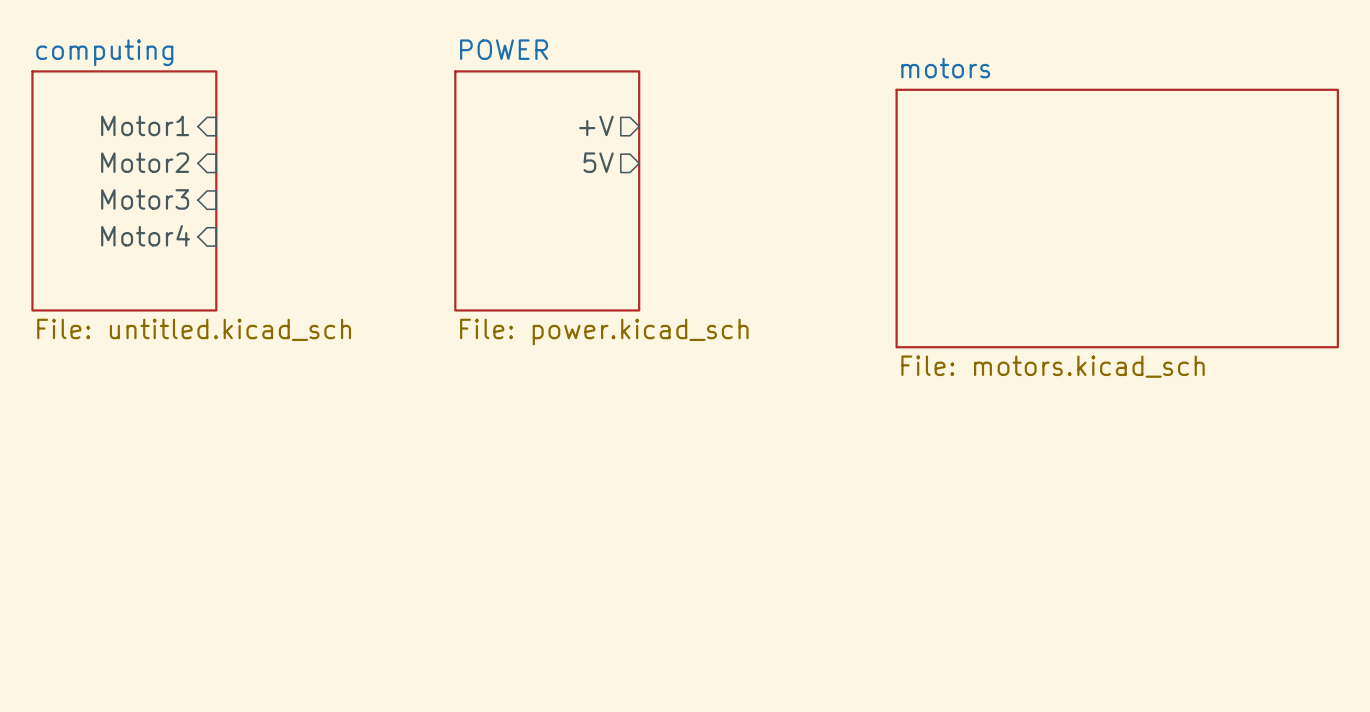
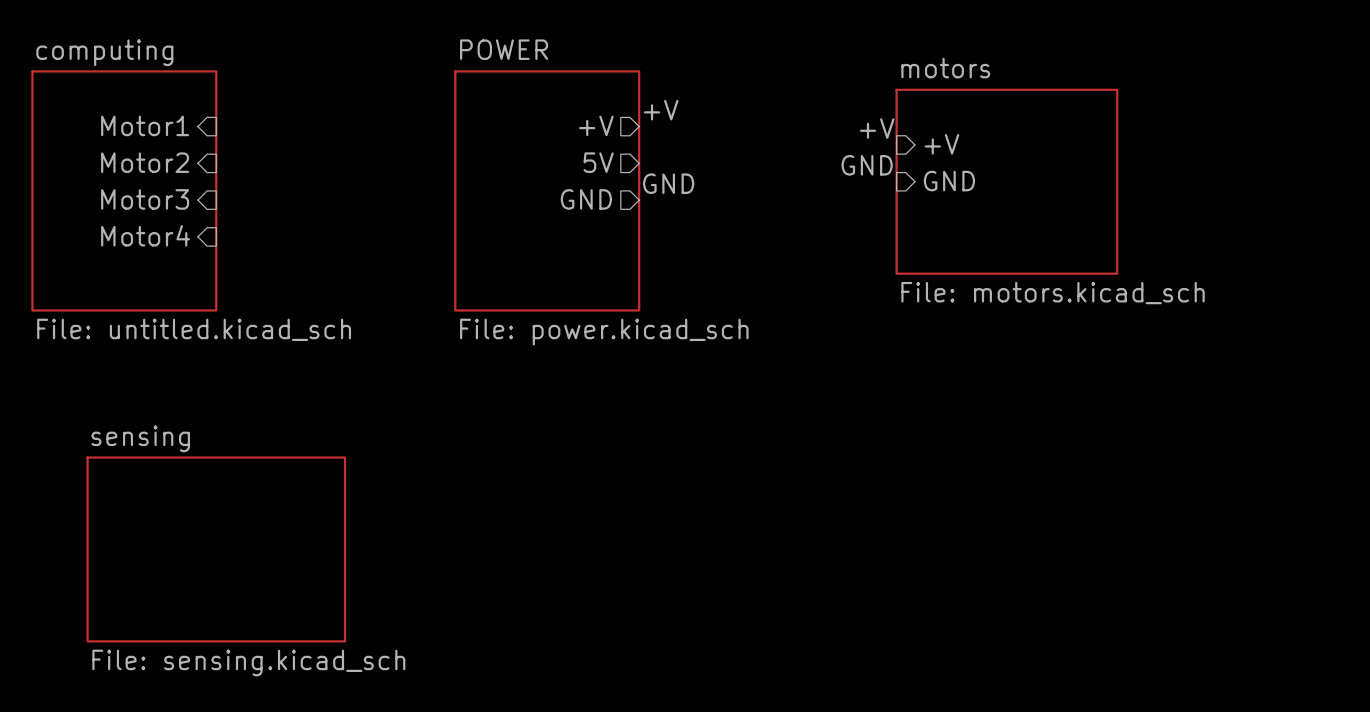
label: none -> +V (661, 110)
label: none -> +V (877, 128)
sheet pin: none -> +V (941, 144)
label: none -> GND (867, 165)
sheet pin: none -> GND (949, 181)
sheet motors: none -> File: motors.kicad_sch (1006, 181)
label: none -> GND (668, 183)
sheet pin: none -> GND (586, 199)
sheet motors: File: motors.kicad_sch (1117, 218) -> none
sheet sensing: none -> File: sensing.kicad_sch (216, 549)

